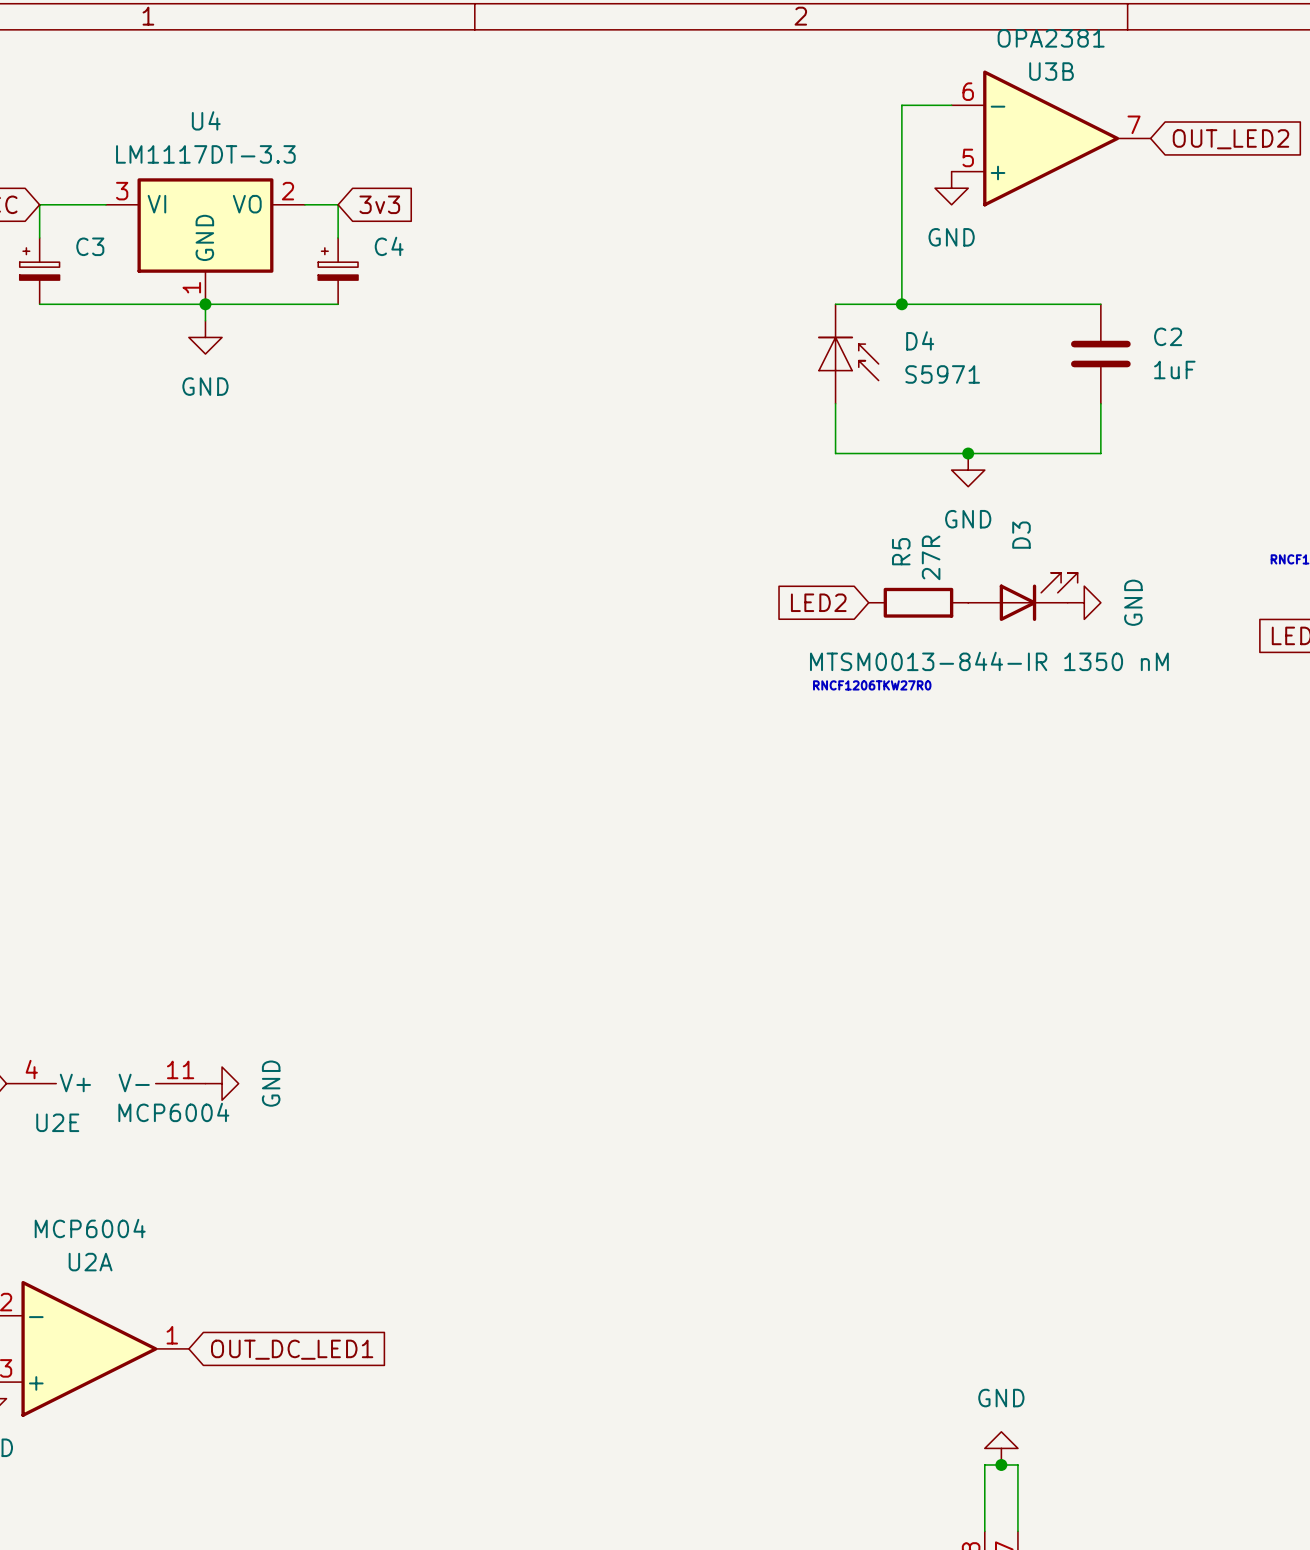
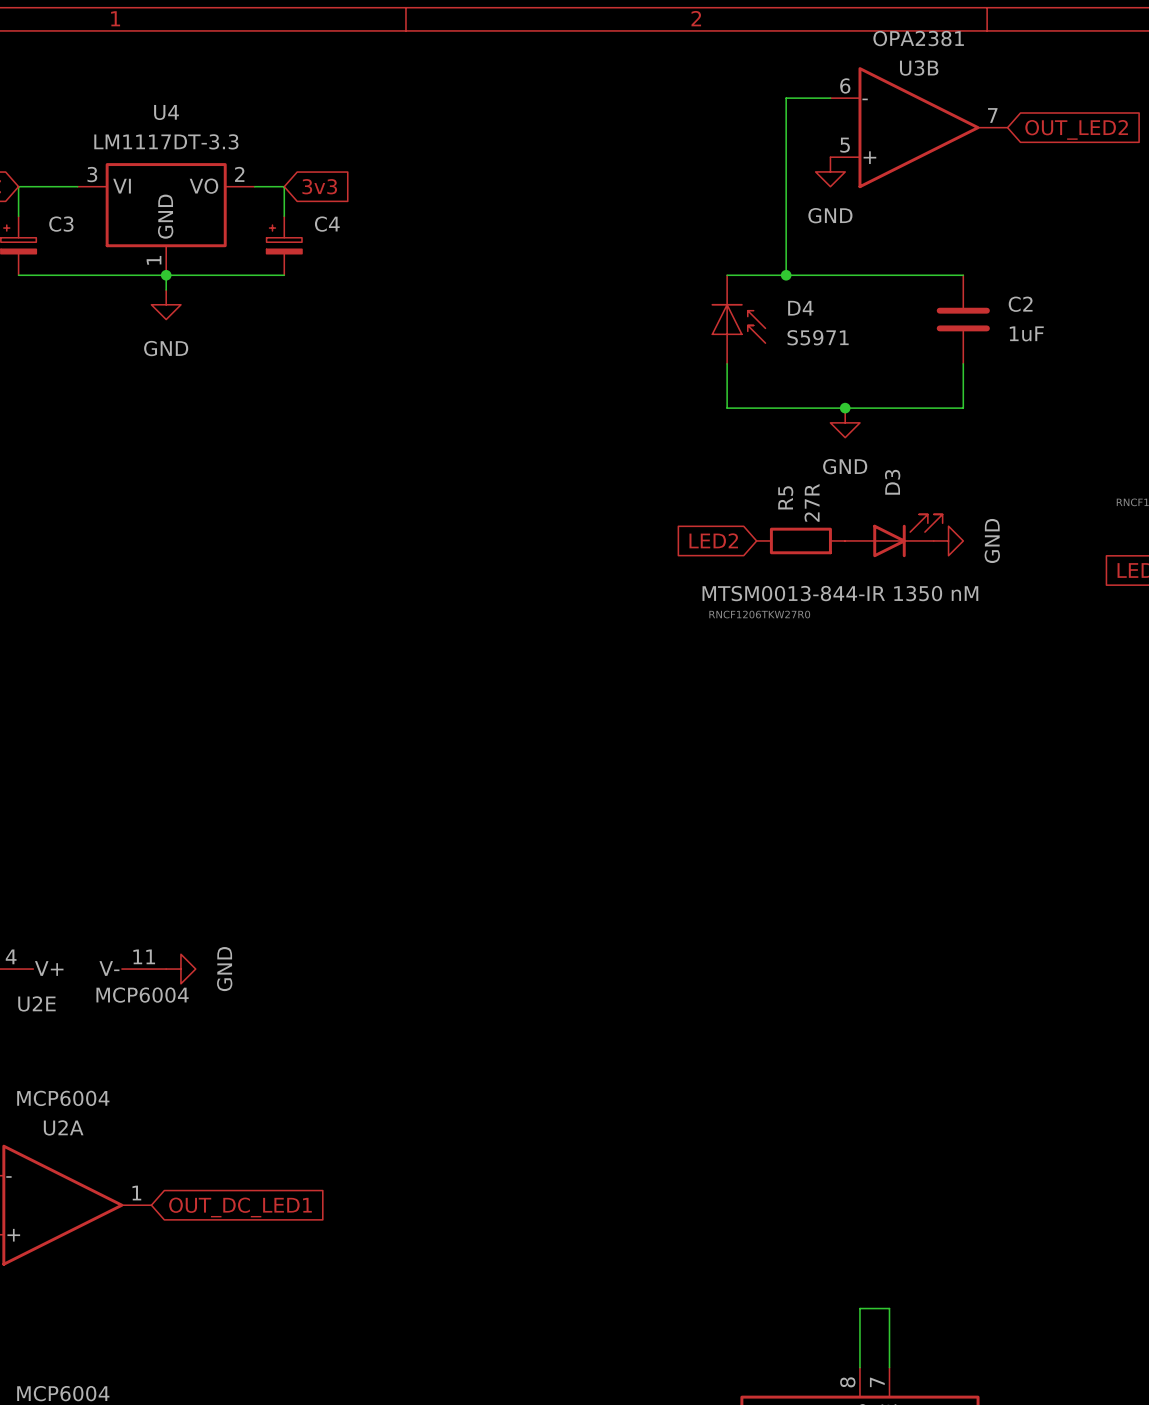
power symbol: GND (1001, 1448) -> none
junction: (1001, 1464) -> none

